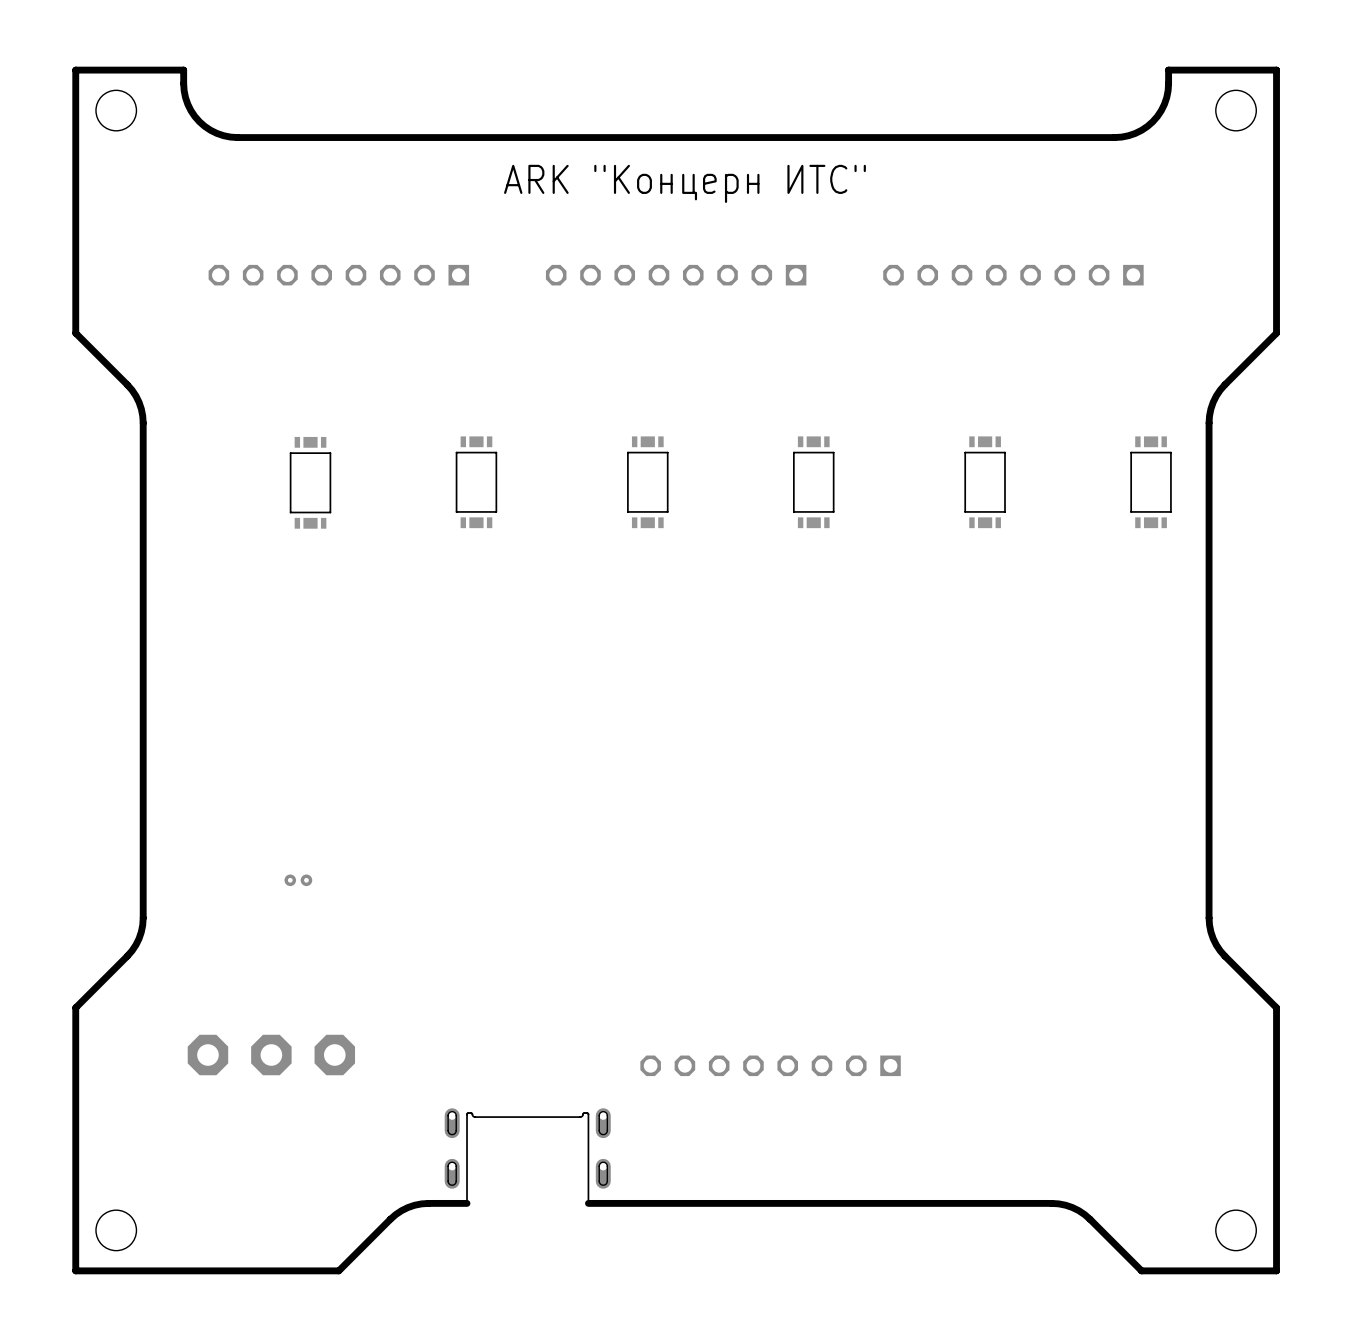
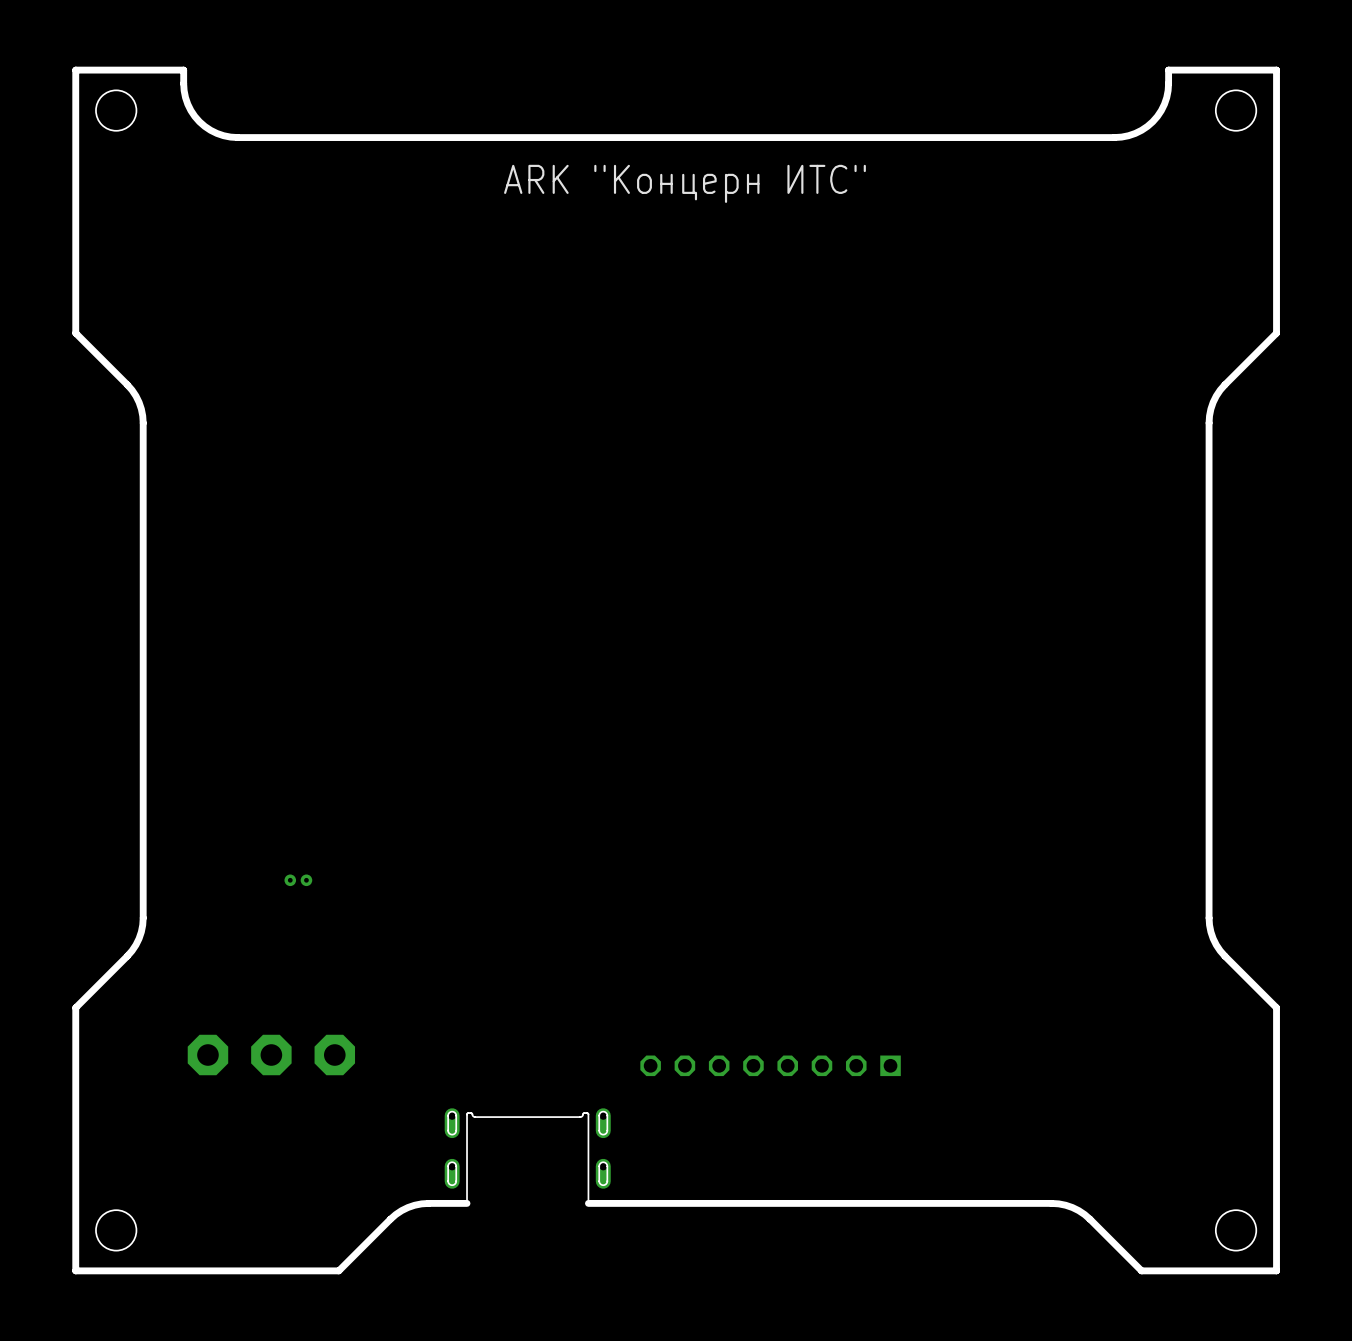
part: (338, 275) -> none
part: (676, 275) -> none
part: (1013, 275) -> none
part: (310, 482) -> none
part: (476, 482) -> none
part: (647, 482) -> none
part: (813, 482) -> none
part: (985, 482) -> none
part: (1151, 482) -> none

